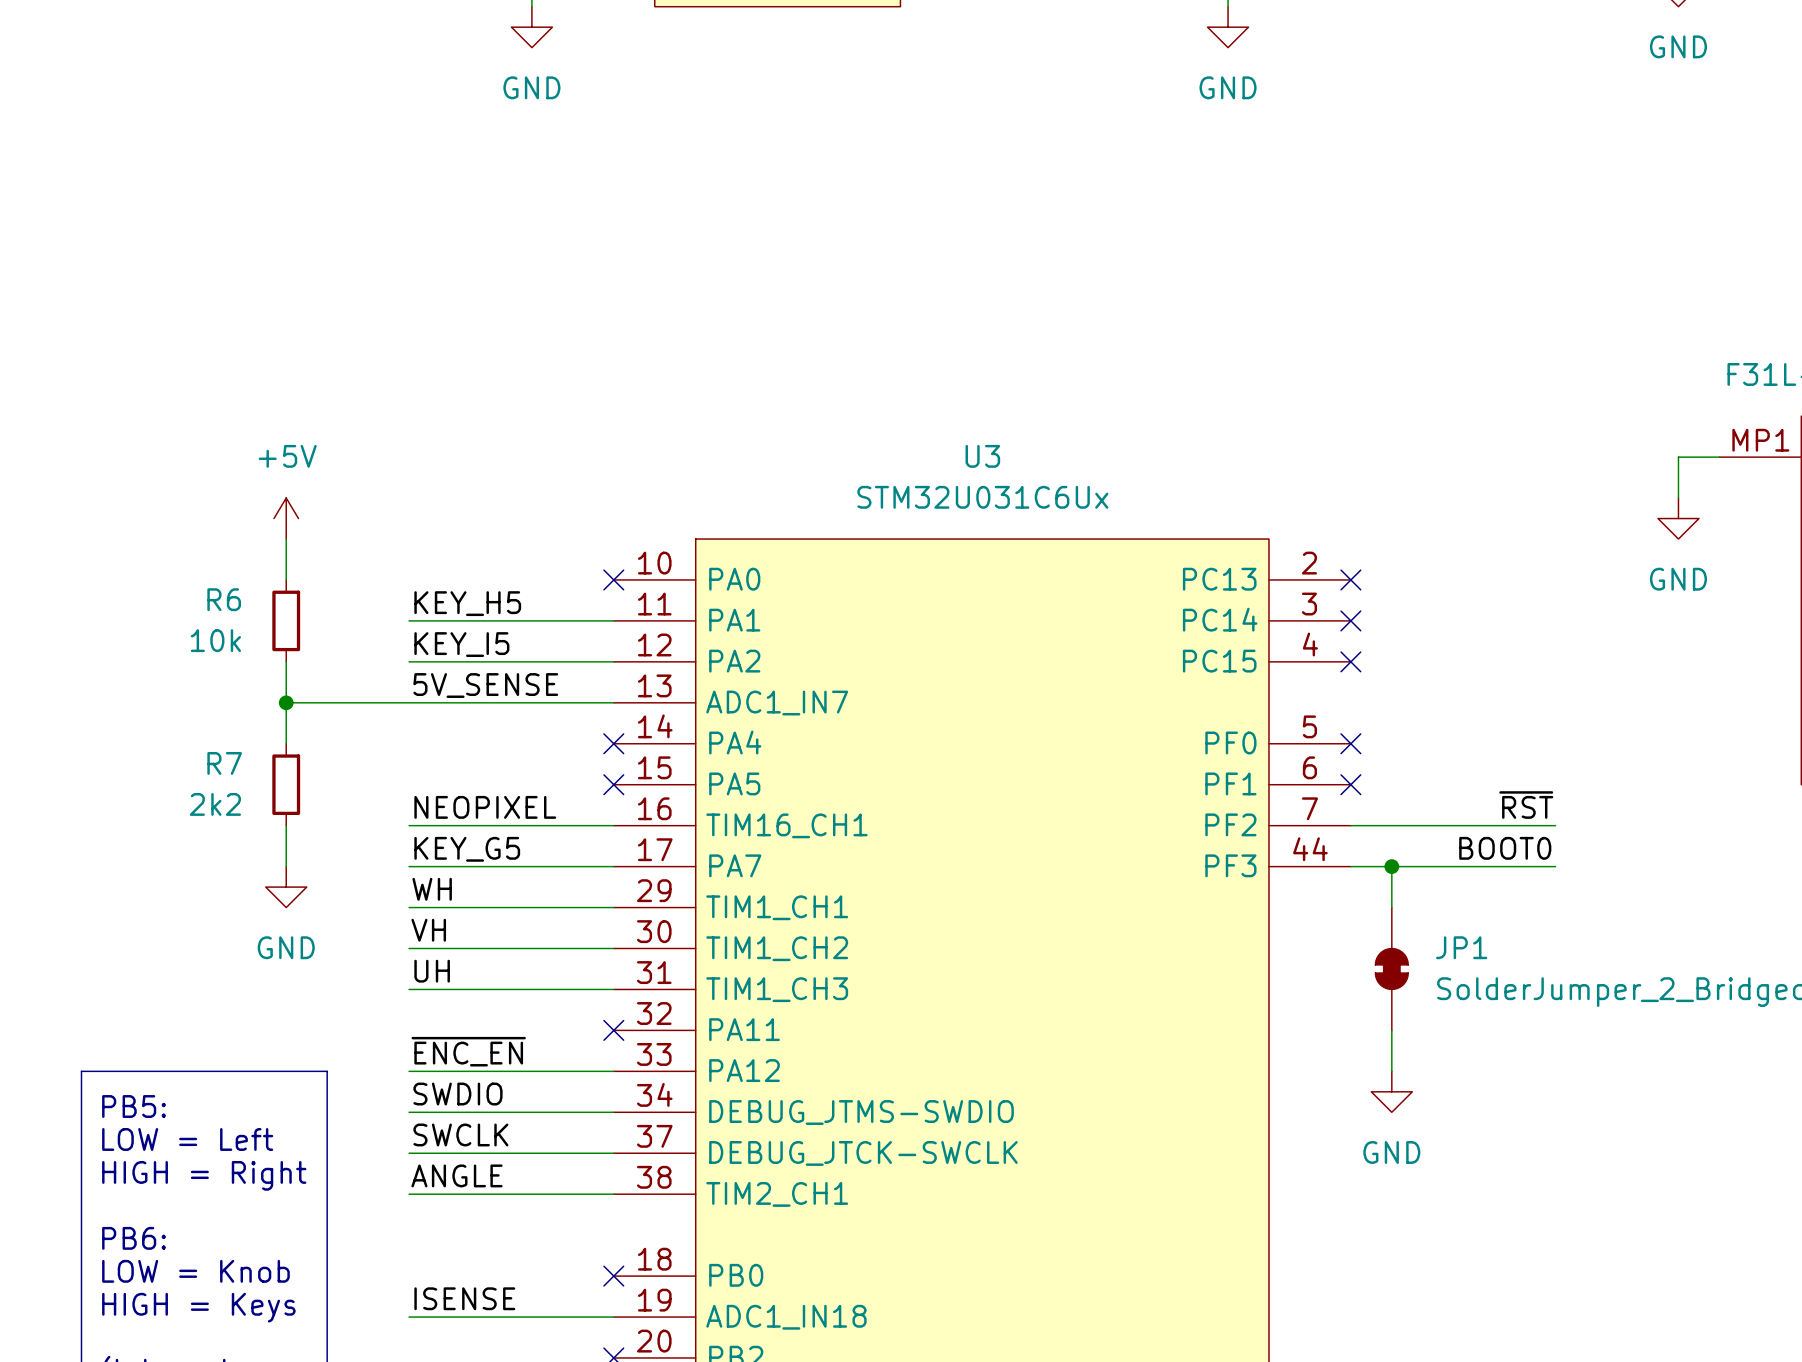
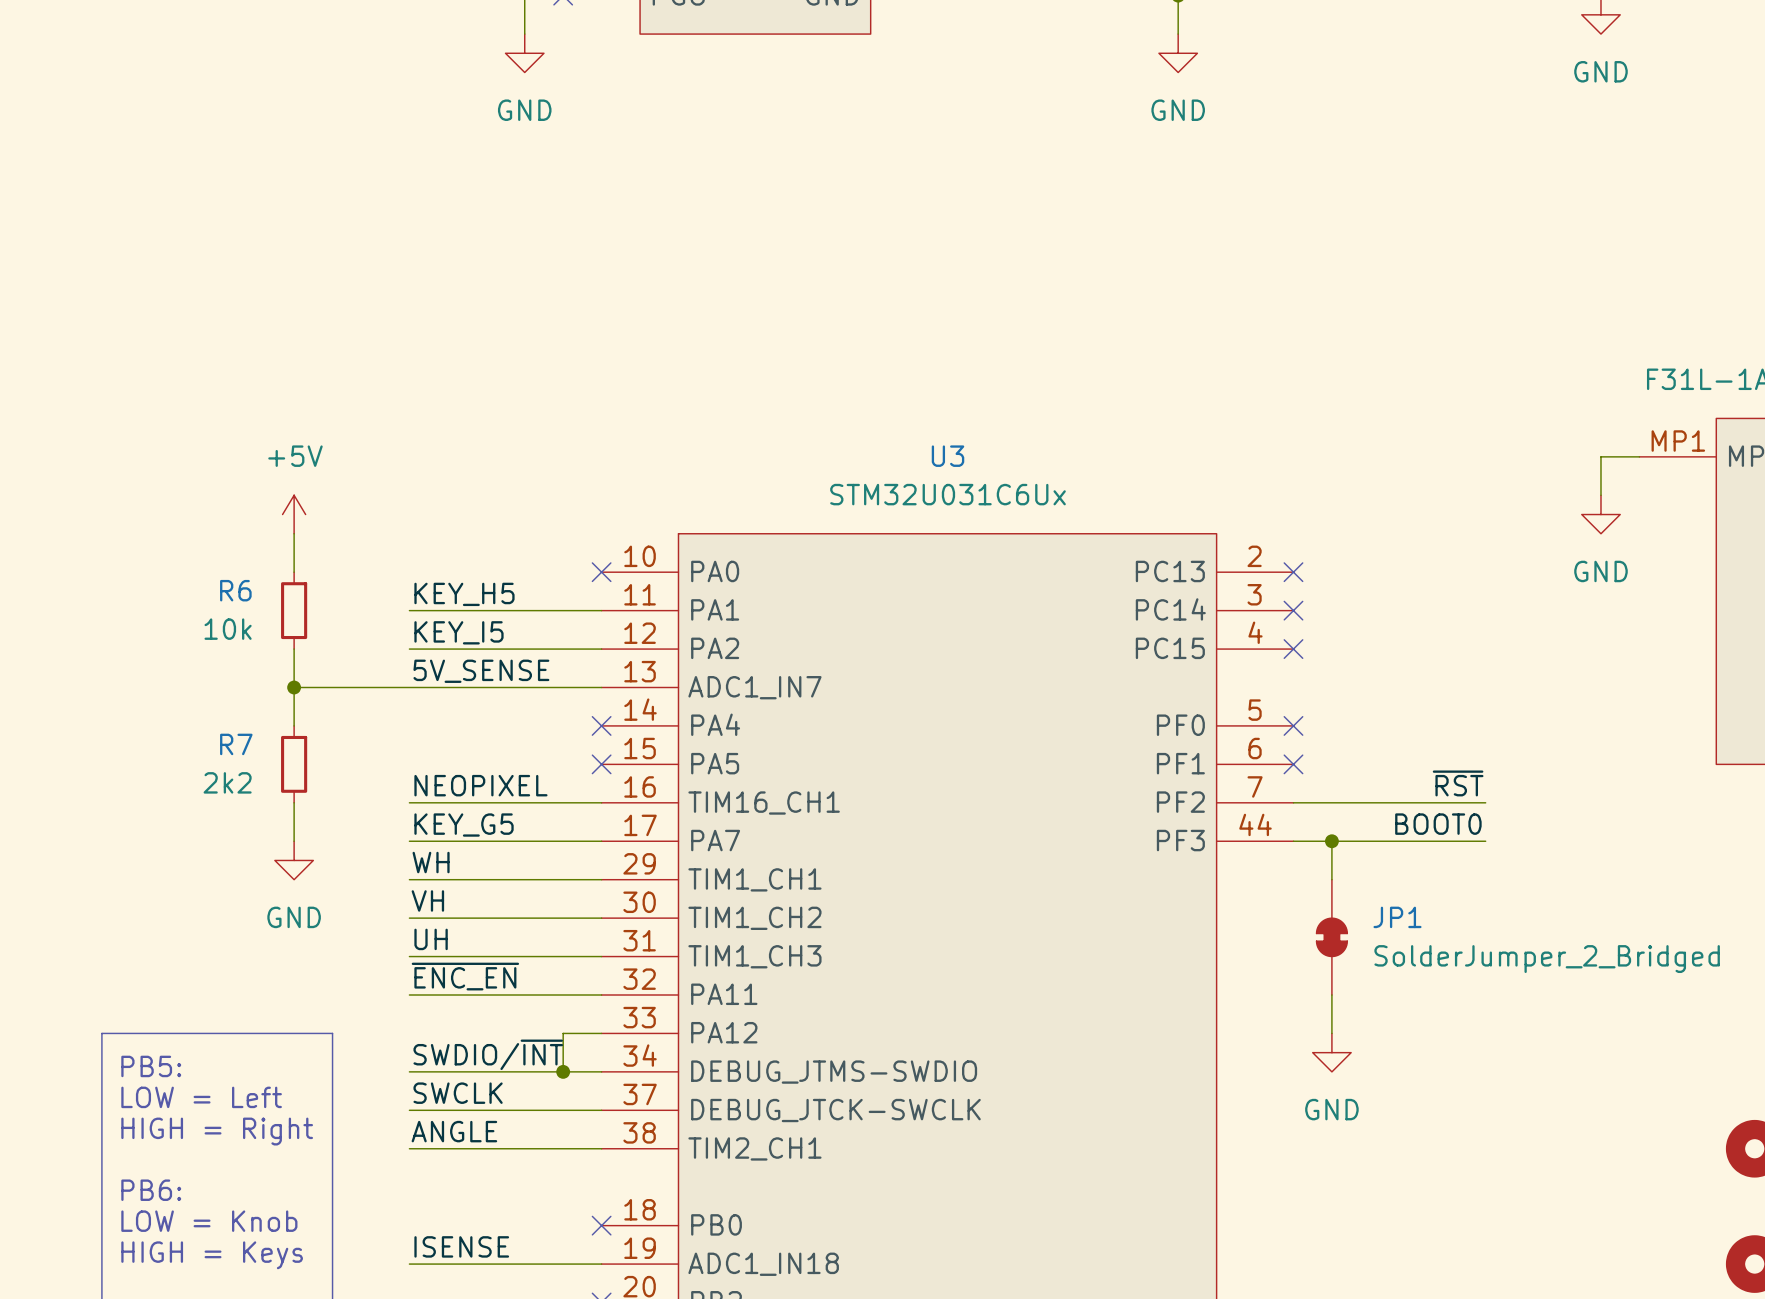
wire: none -> (409, 995) (601, 995)
no-connect mark: (613, 1030) -> none
label position: ~{ENC_EN} (468, 1051) -> ~{ENC_EN} (465, 976)
wire: (409, 1071) (572, 1071) -> (563, 1071) (563, 1033)
label: SWDIO (457, 1094) -> SWDIO/~{INT} (488, 1054)
junction: none -> (563, 1071)

